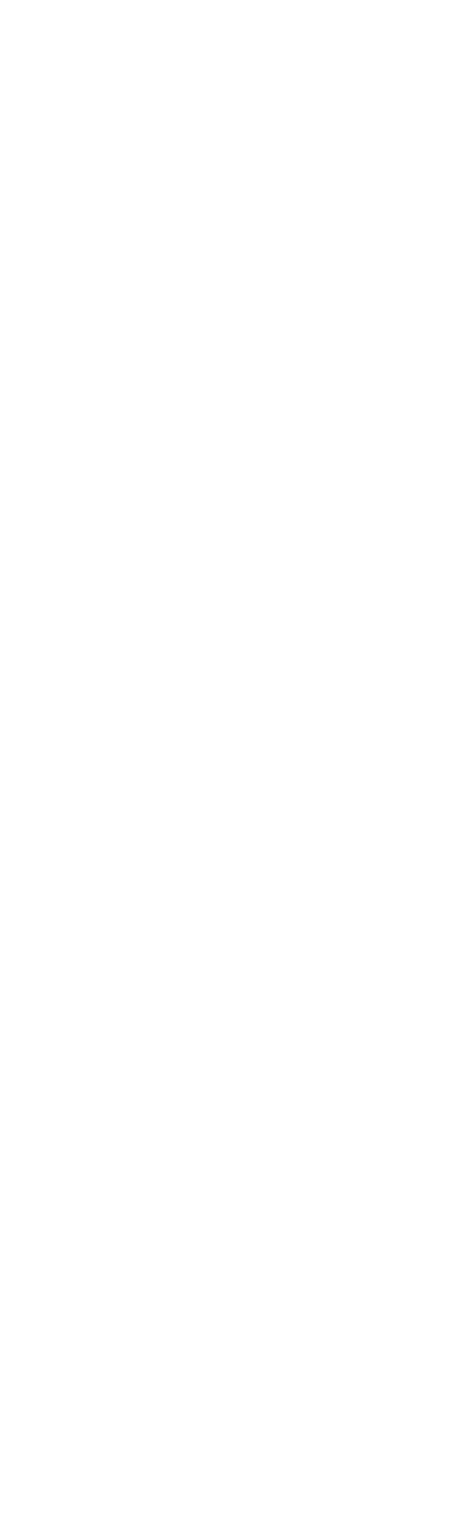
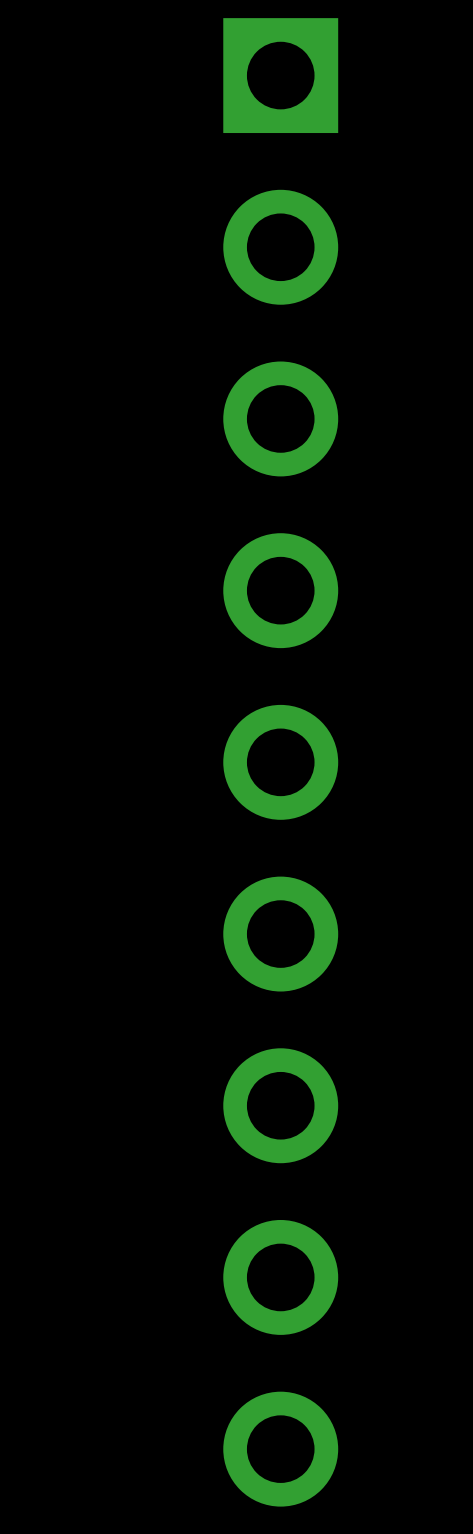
part: none -> (280, 762)

